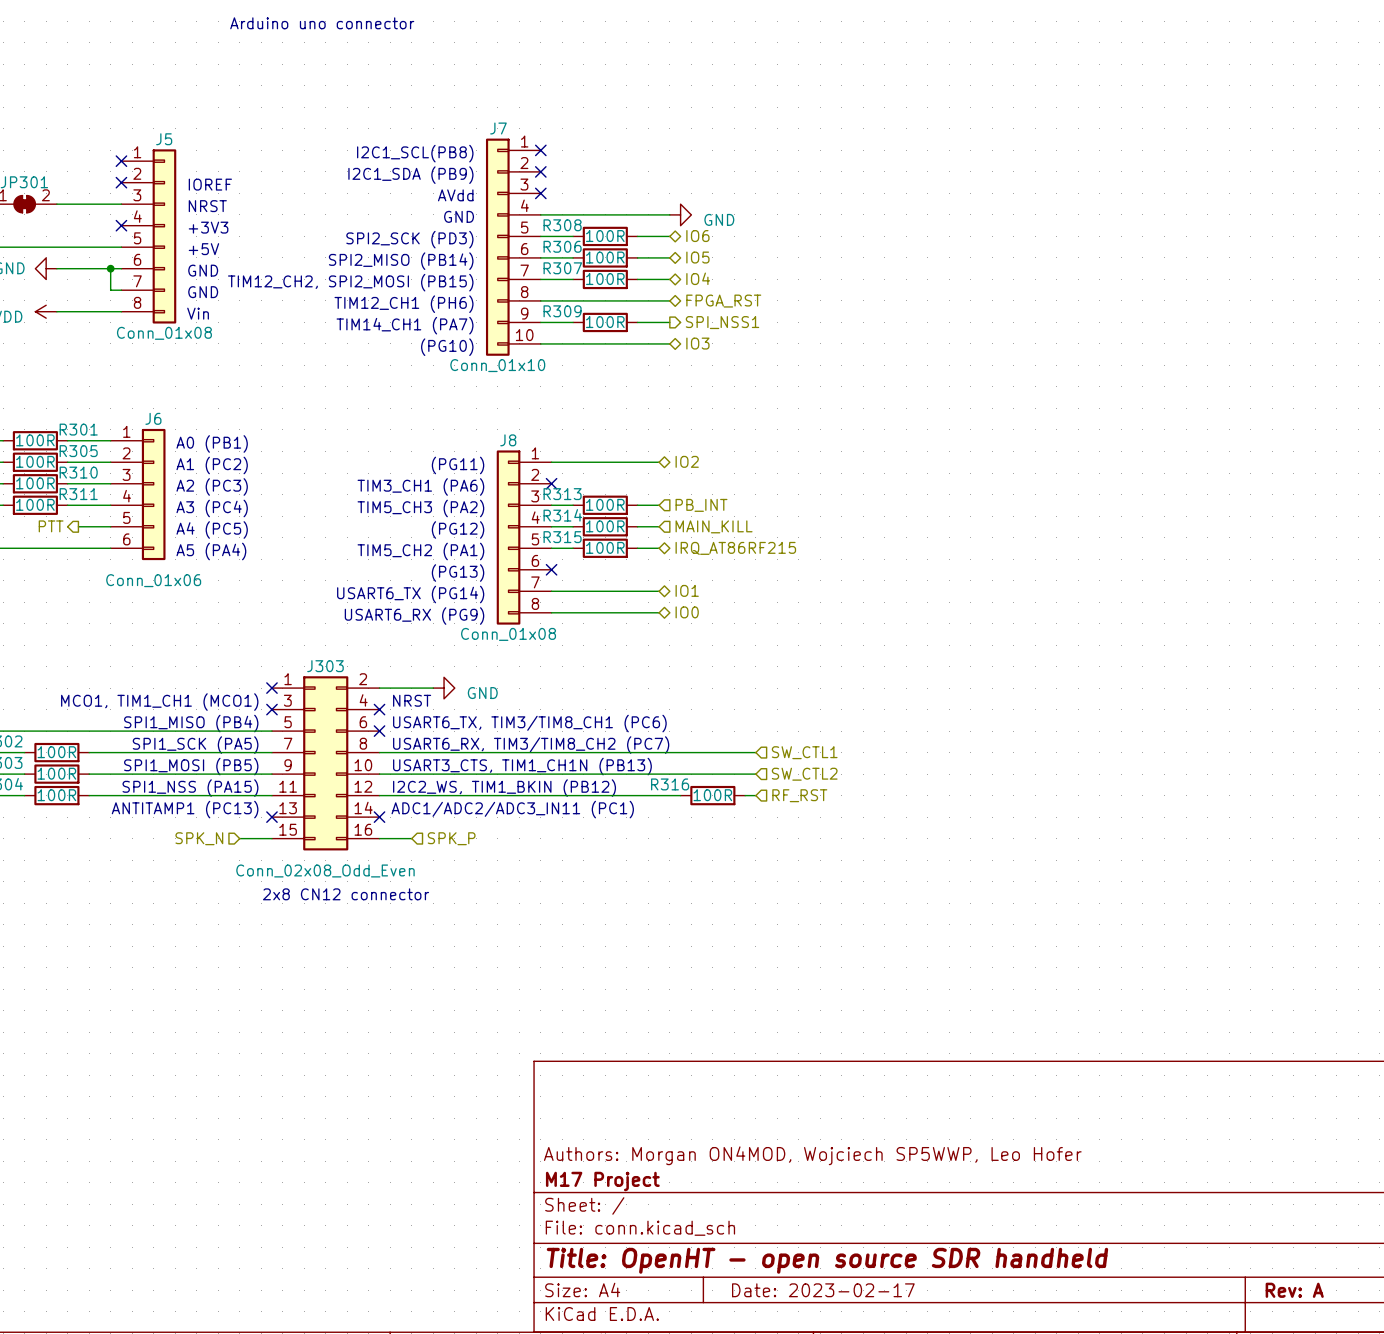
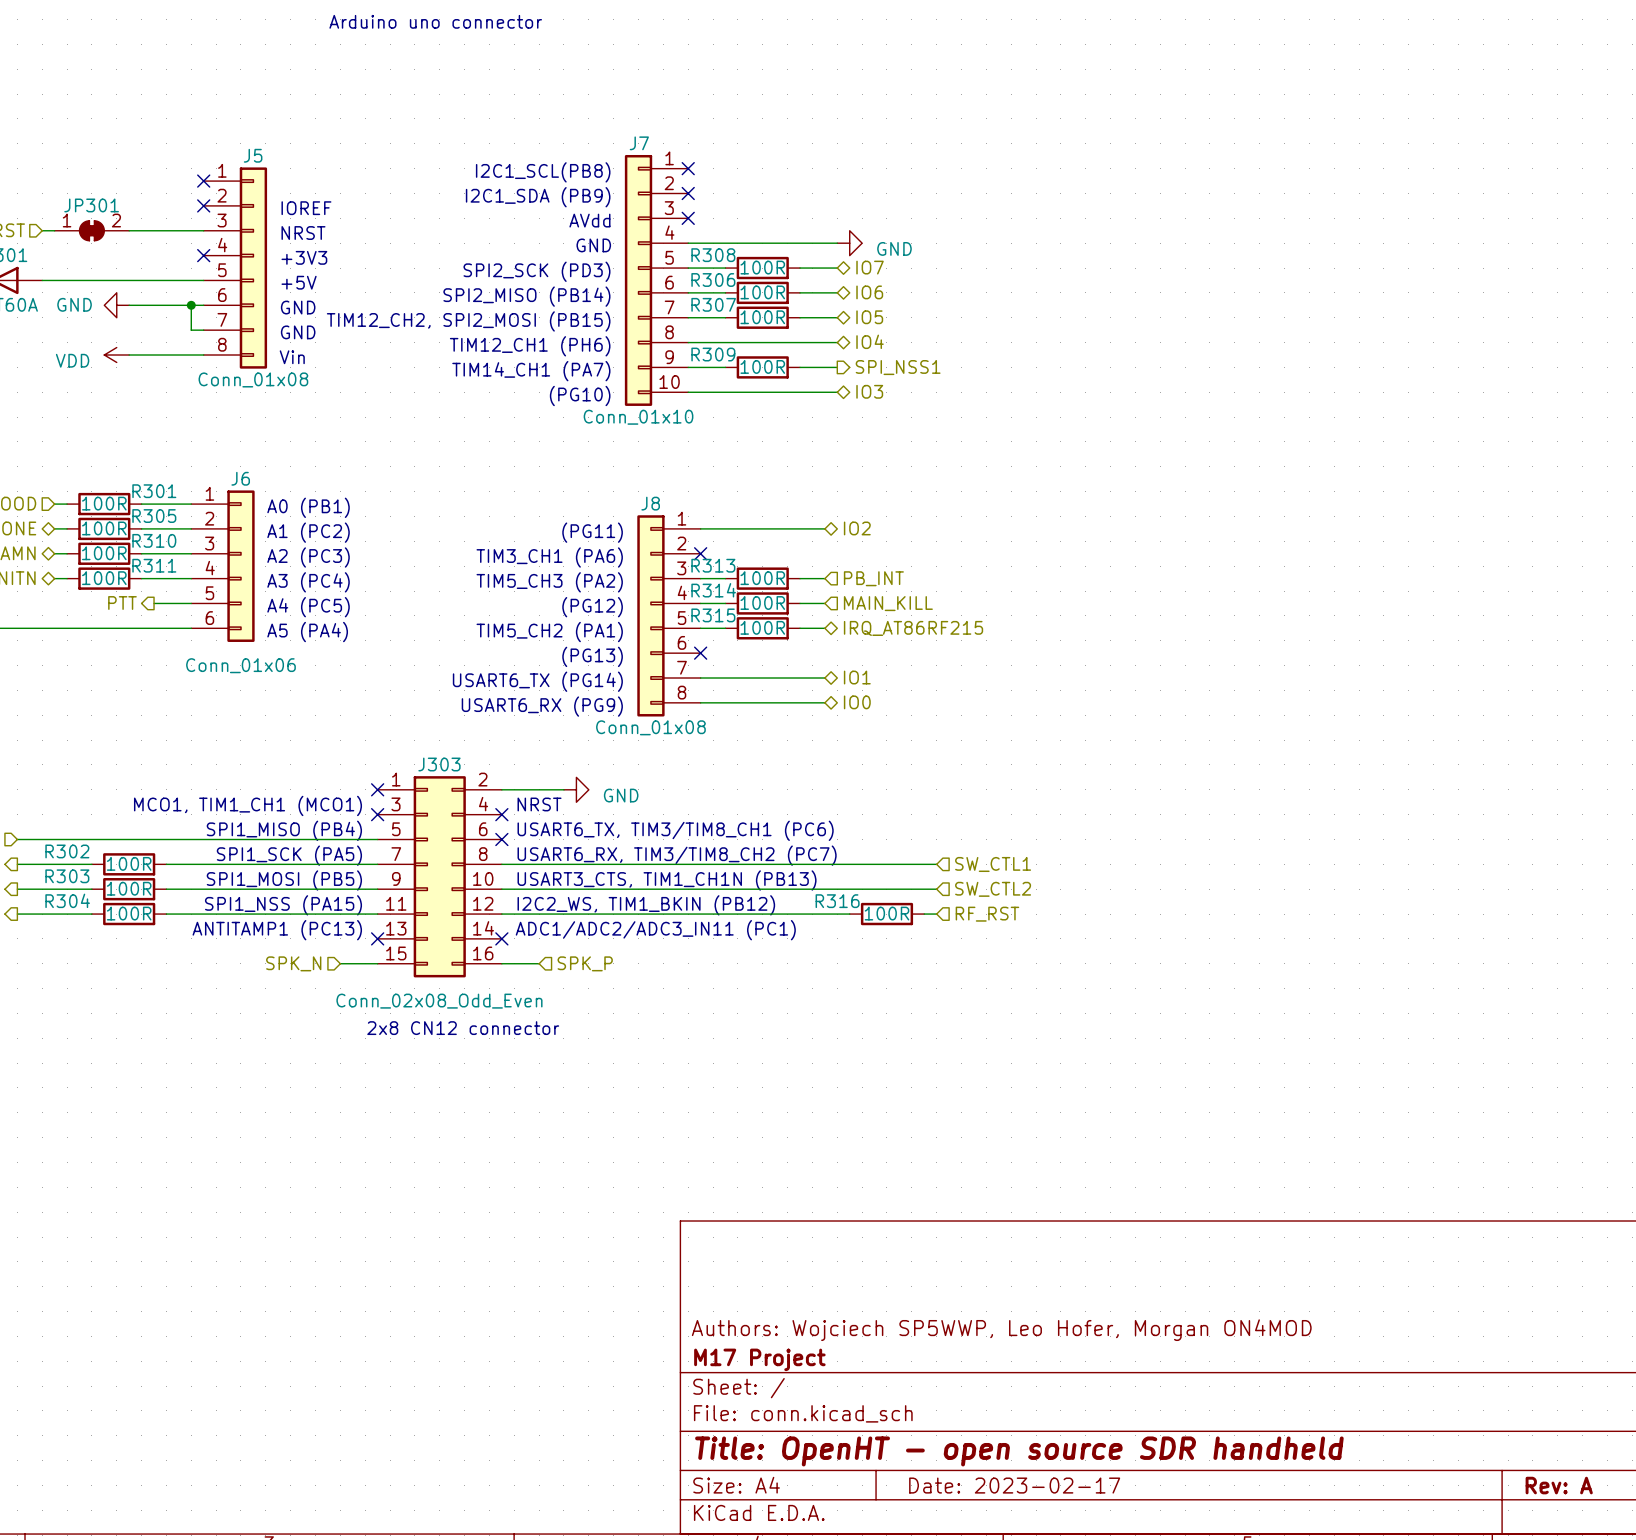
hierarchical label: IO6 (697, 236) -> IO7 (870, 267)
hierarchical label: IO5 (697, 257) -> IO6 (869, 292)
hierarchical label: IO4 (698, 278) -> IO5 (869, 317)
hierarchical label: FPGA_RST (723, 301) -> IO4 (870, 341)
title block: Authors: Morgan ON4MOD, Wojciech SP5WWP, Leo Hofer (812, 1155) -> Authors: Wojciech SP5WWP, Leo Hofer, Morgan ON4MOD (1001, 1330)

